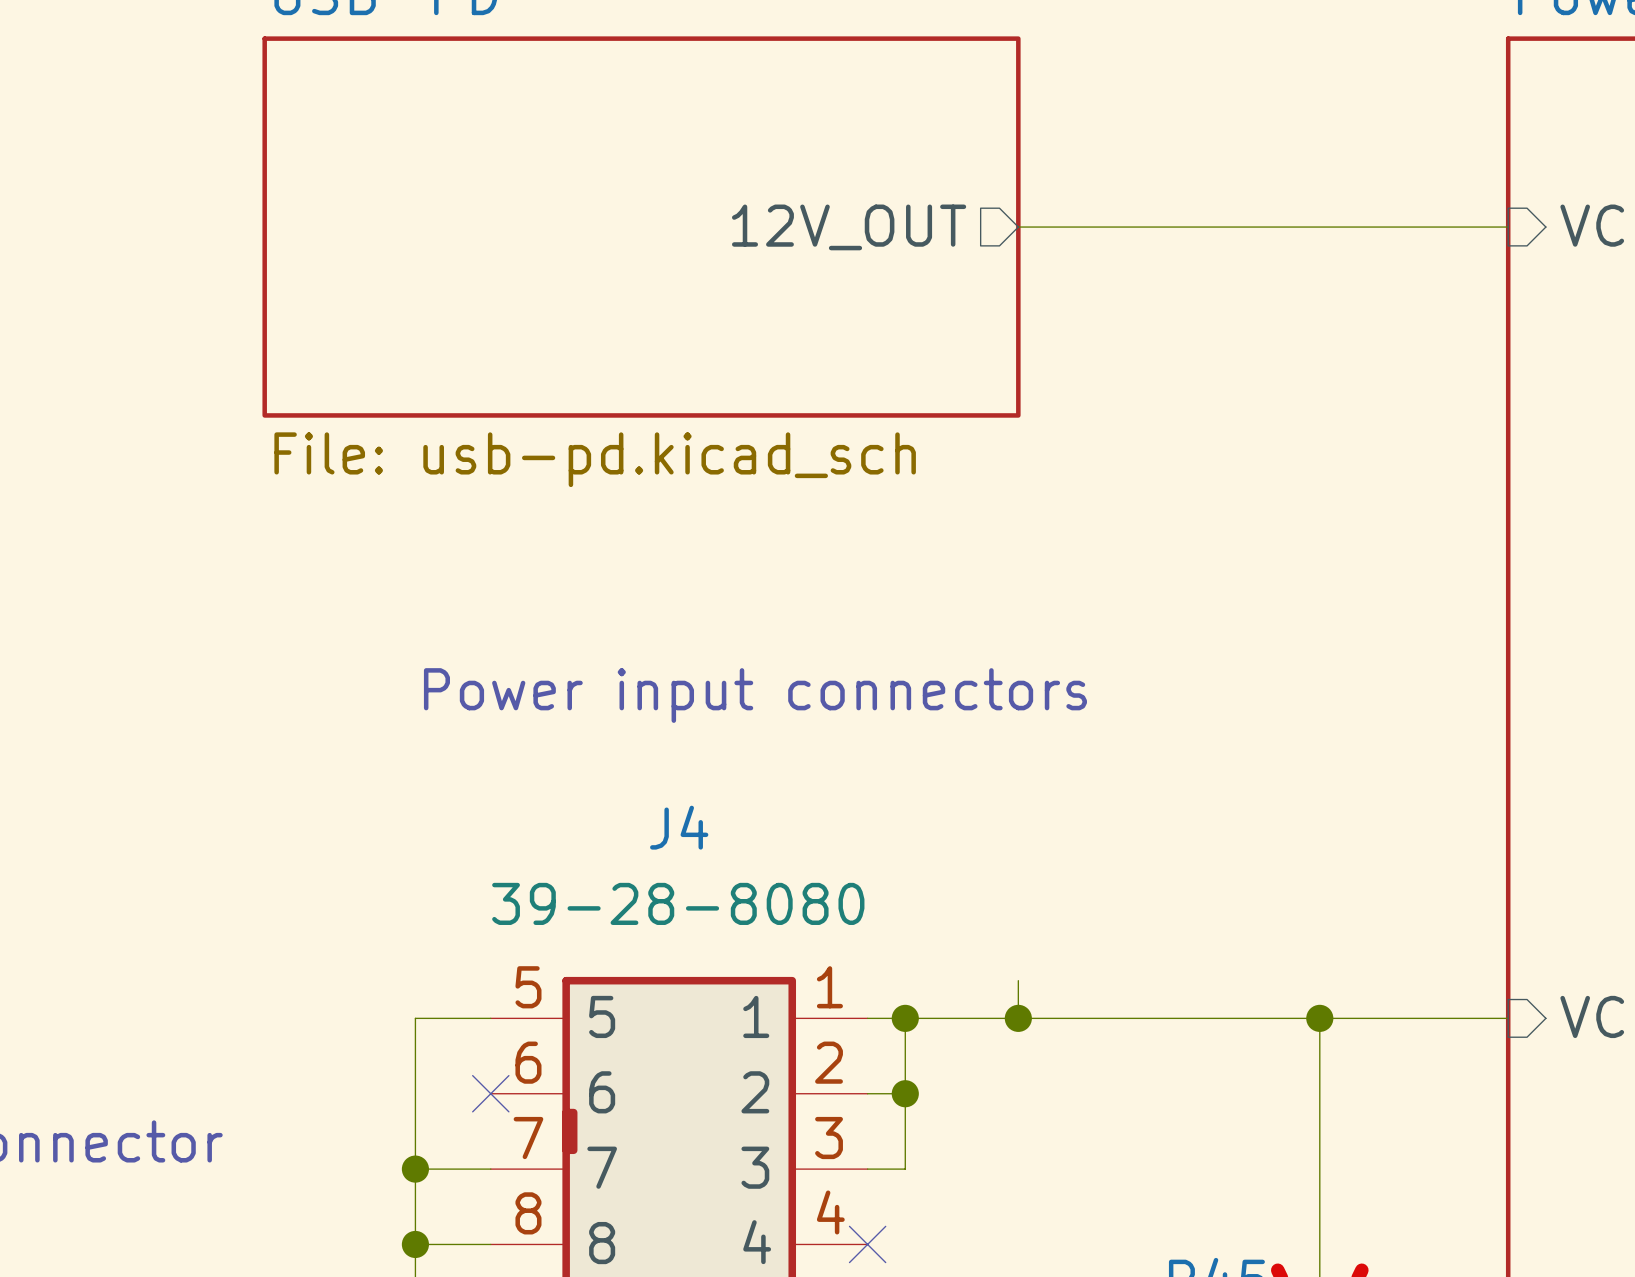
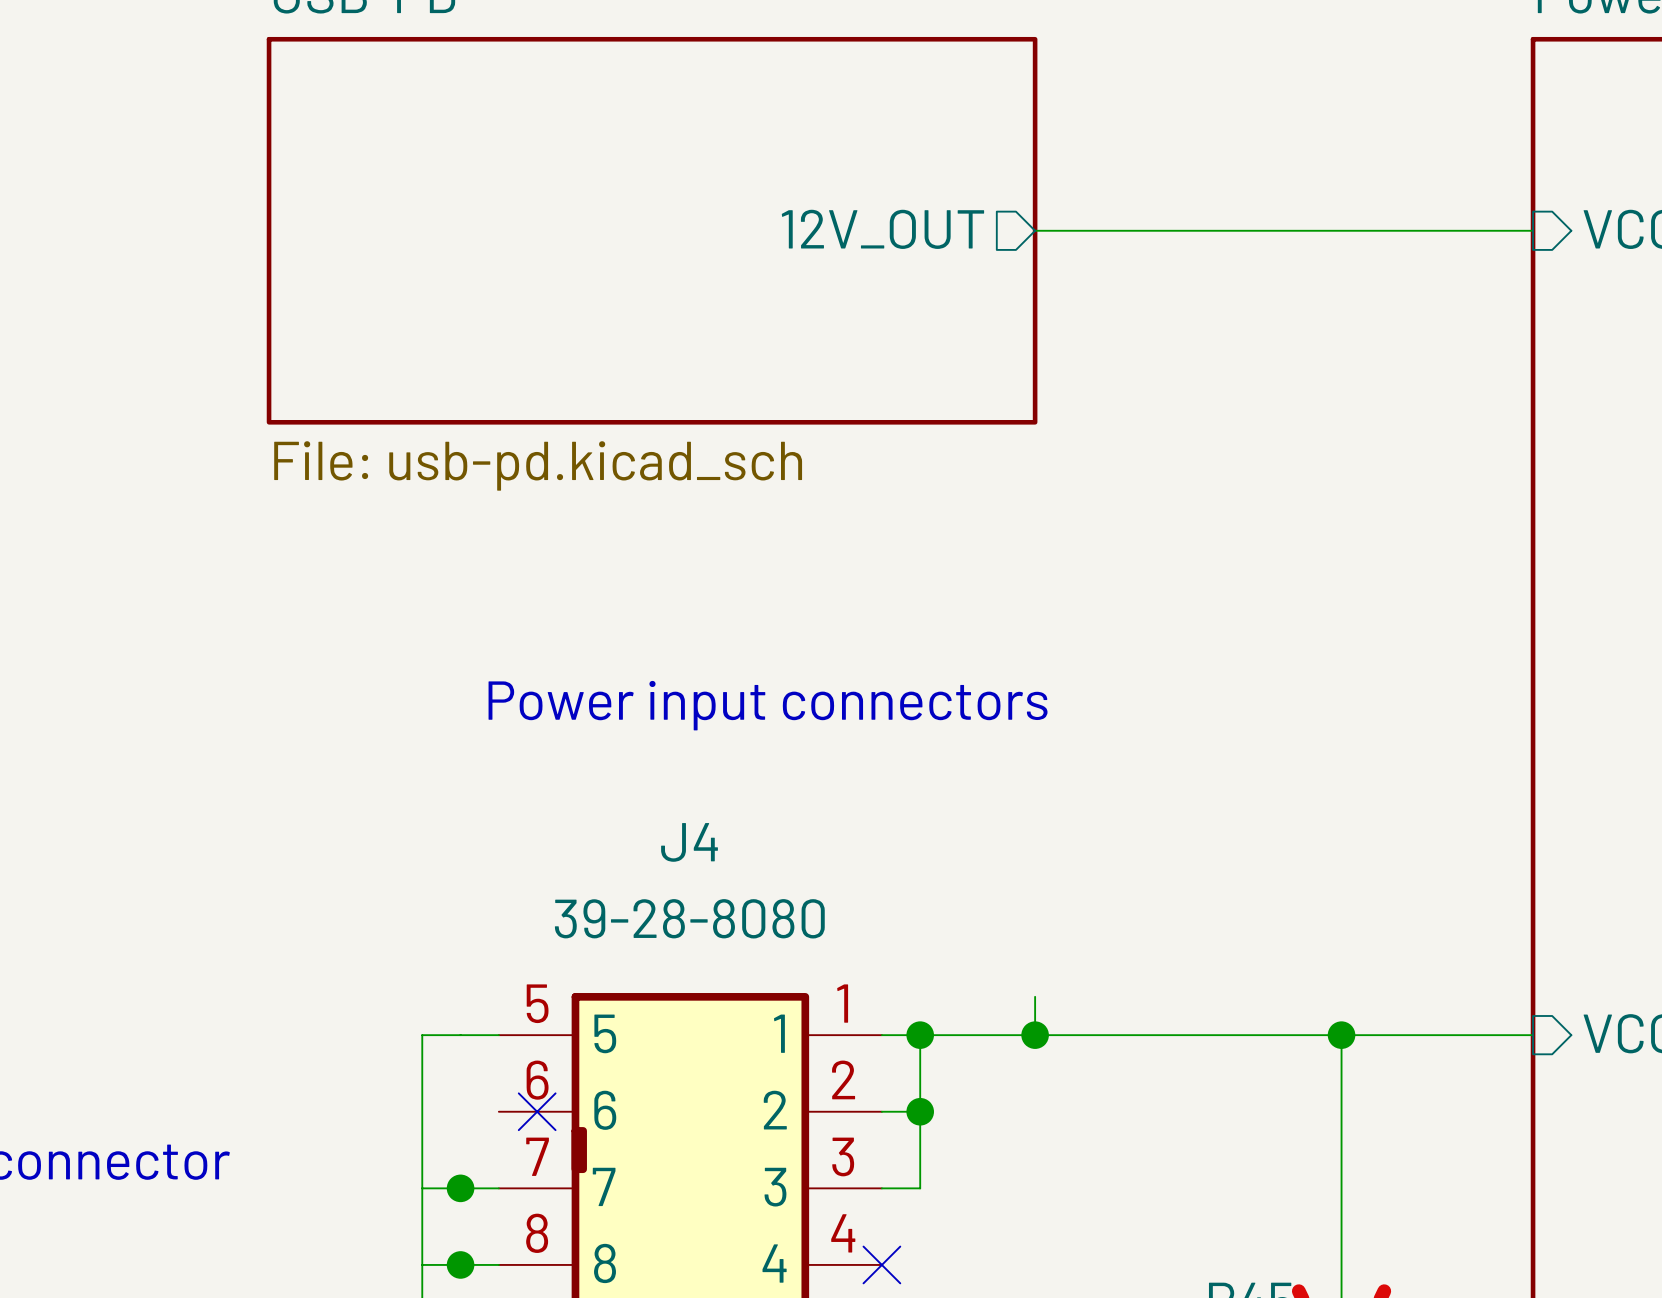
no-connect mark position: (490, 1093) -> (537, 1111)
junction position: (415, 1169) -> (460, 1188)
junction position: (415, 1244) -> (460, 1264)

